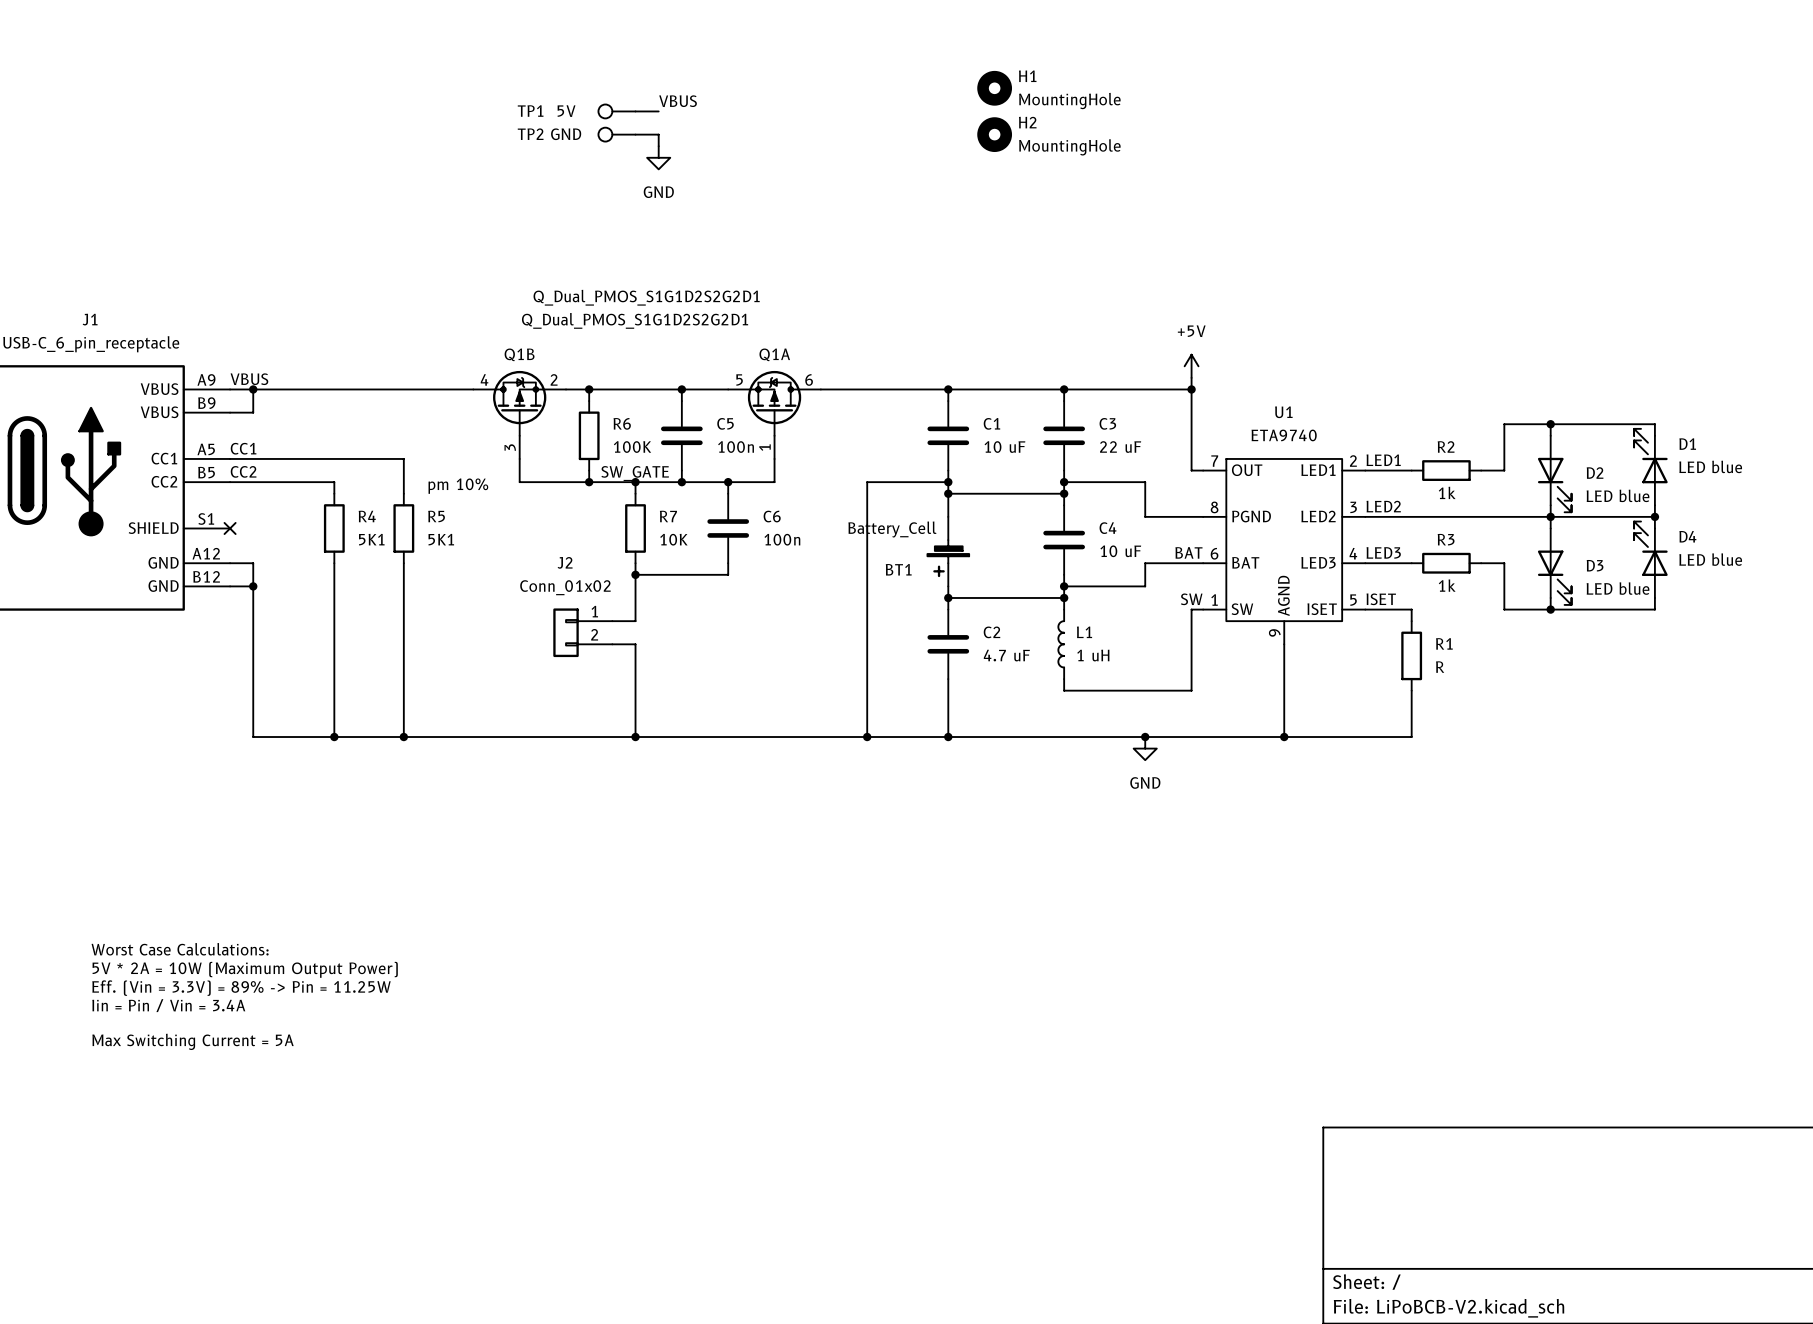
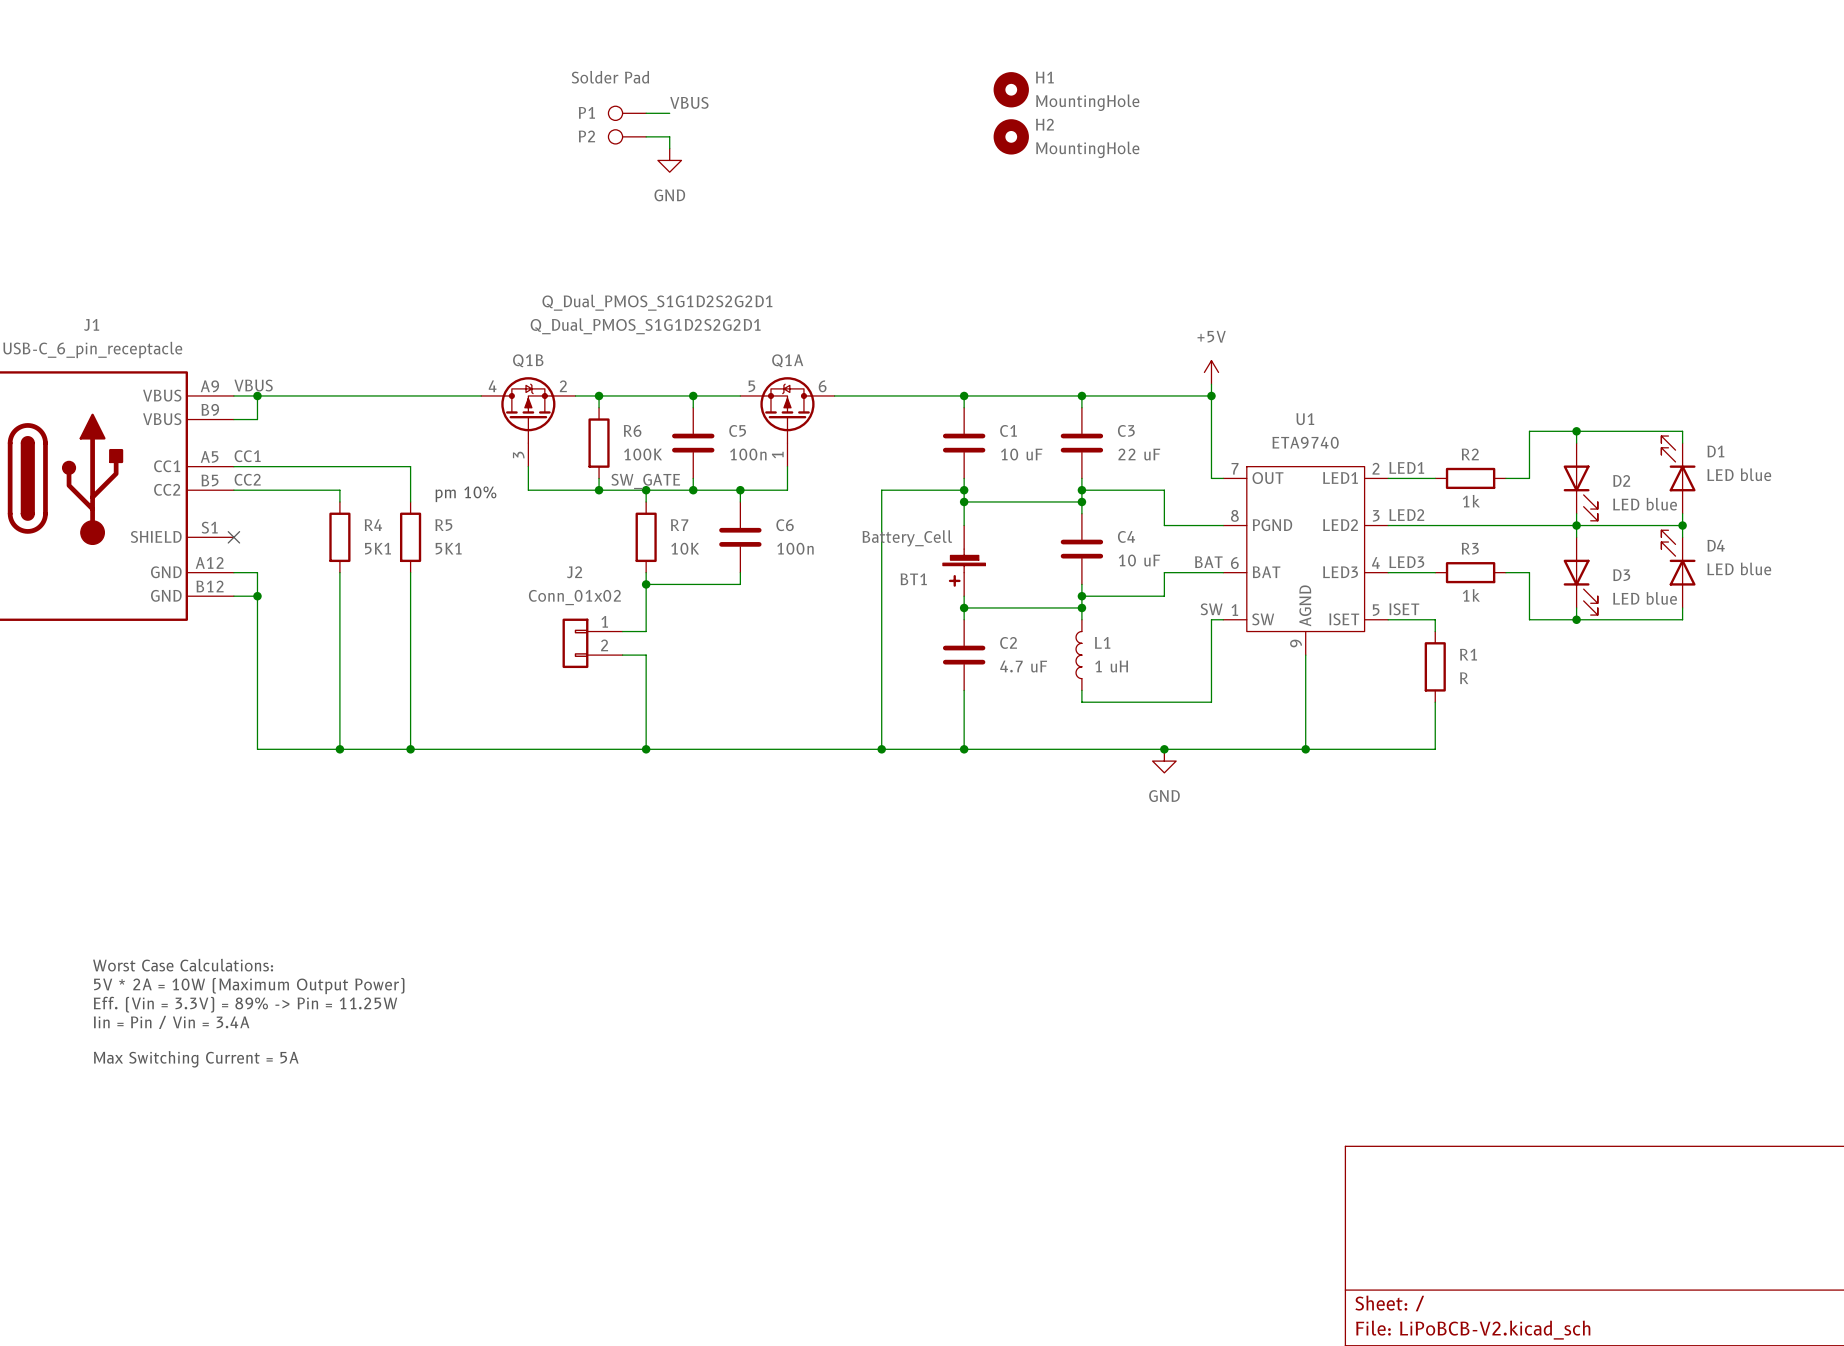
TP1 name: TP1 (530, 111) -> P1 (586, 112)
TP1 value: 5V (566, 111) -> Solder Pad (610, 77)
TP2 name: TP2 (530, 134) -> P2 (586, 136)
TP2 value: GND (566, 134) -> none

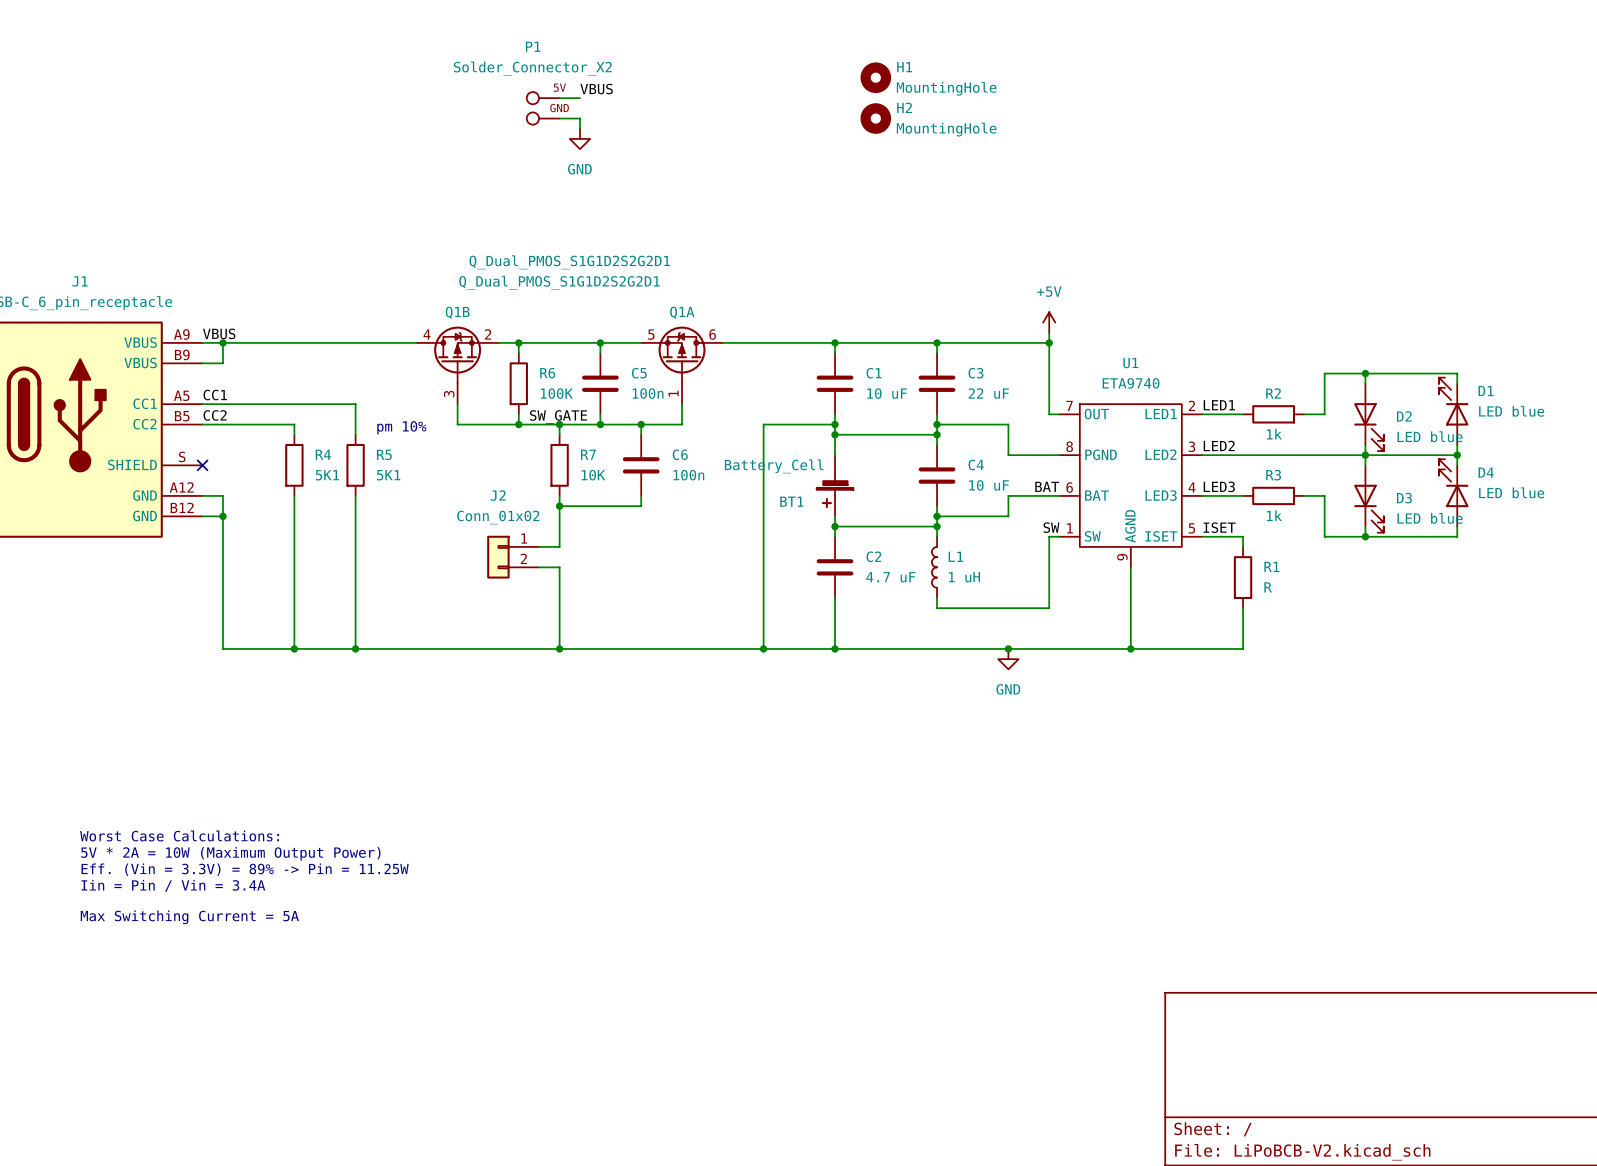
P1 value: Solder Pad (610, 77) -> Solder_Connector_X2 (532, 68)
P1 symbol: [608, 106, 647, 121] -> [526, 92, 560, 125]
P1 name position: P1 (586, 112) -> P1 (533, 46)
P2: (627, 136) -> none
J1 pin number: S1 (209, 527) -> S (182, 456)

